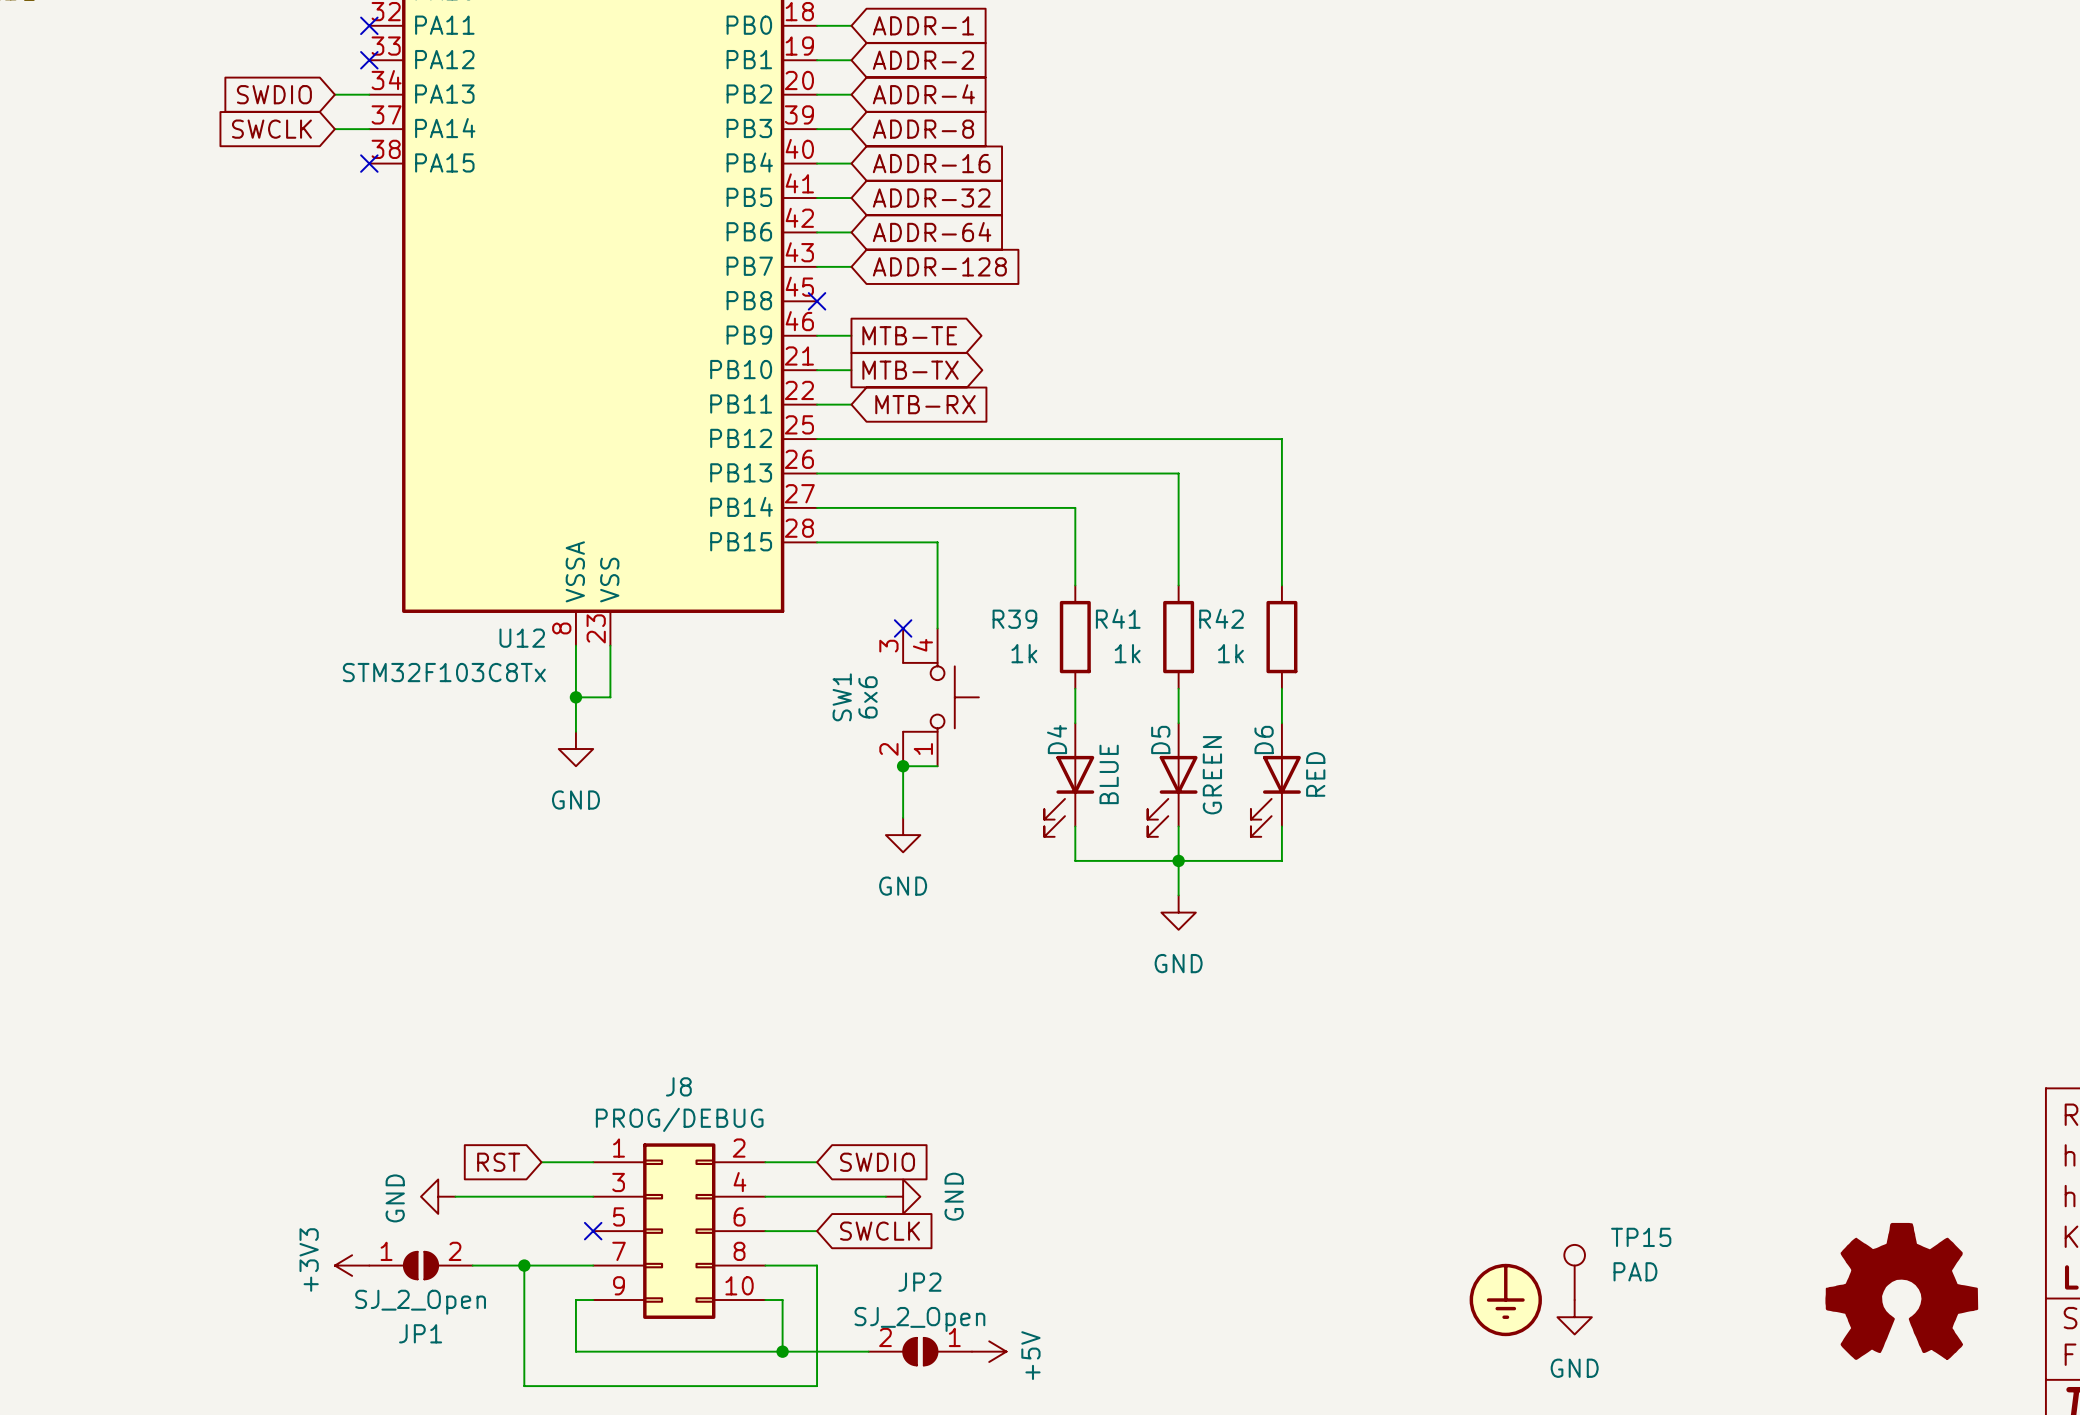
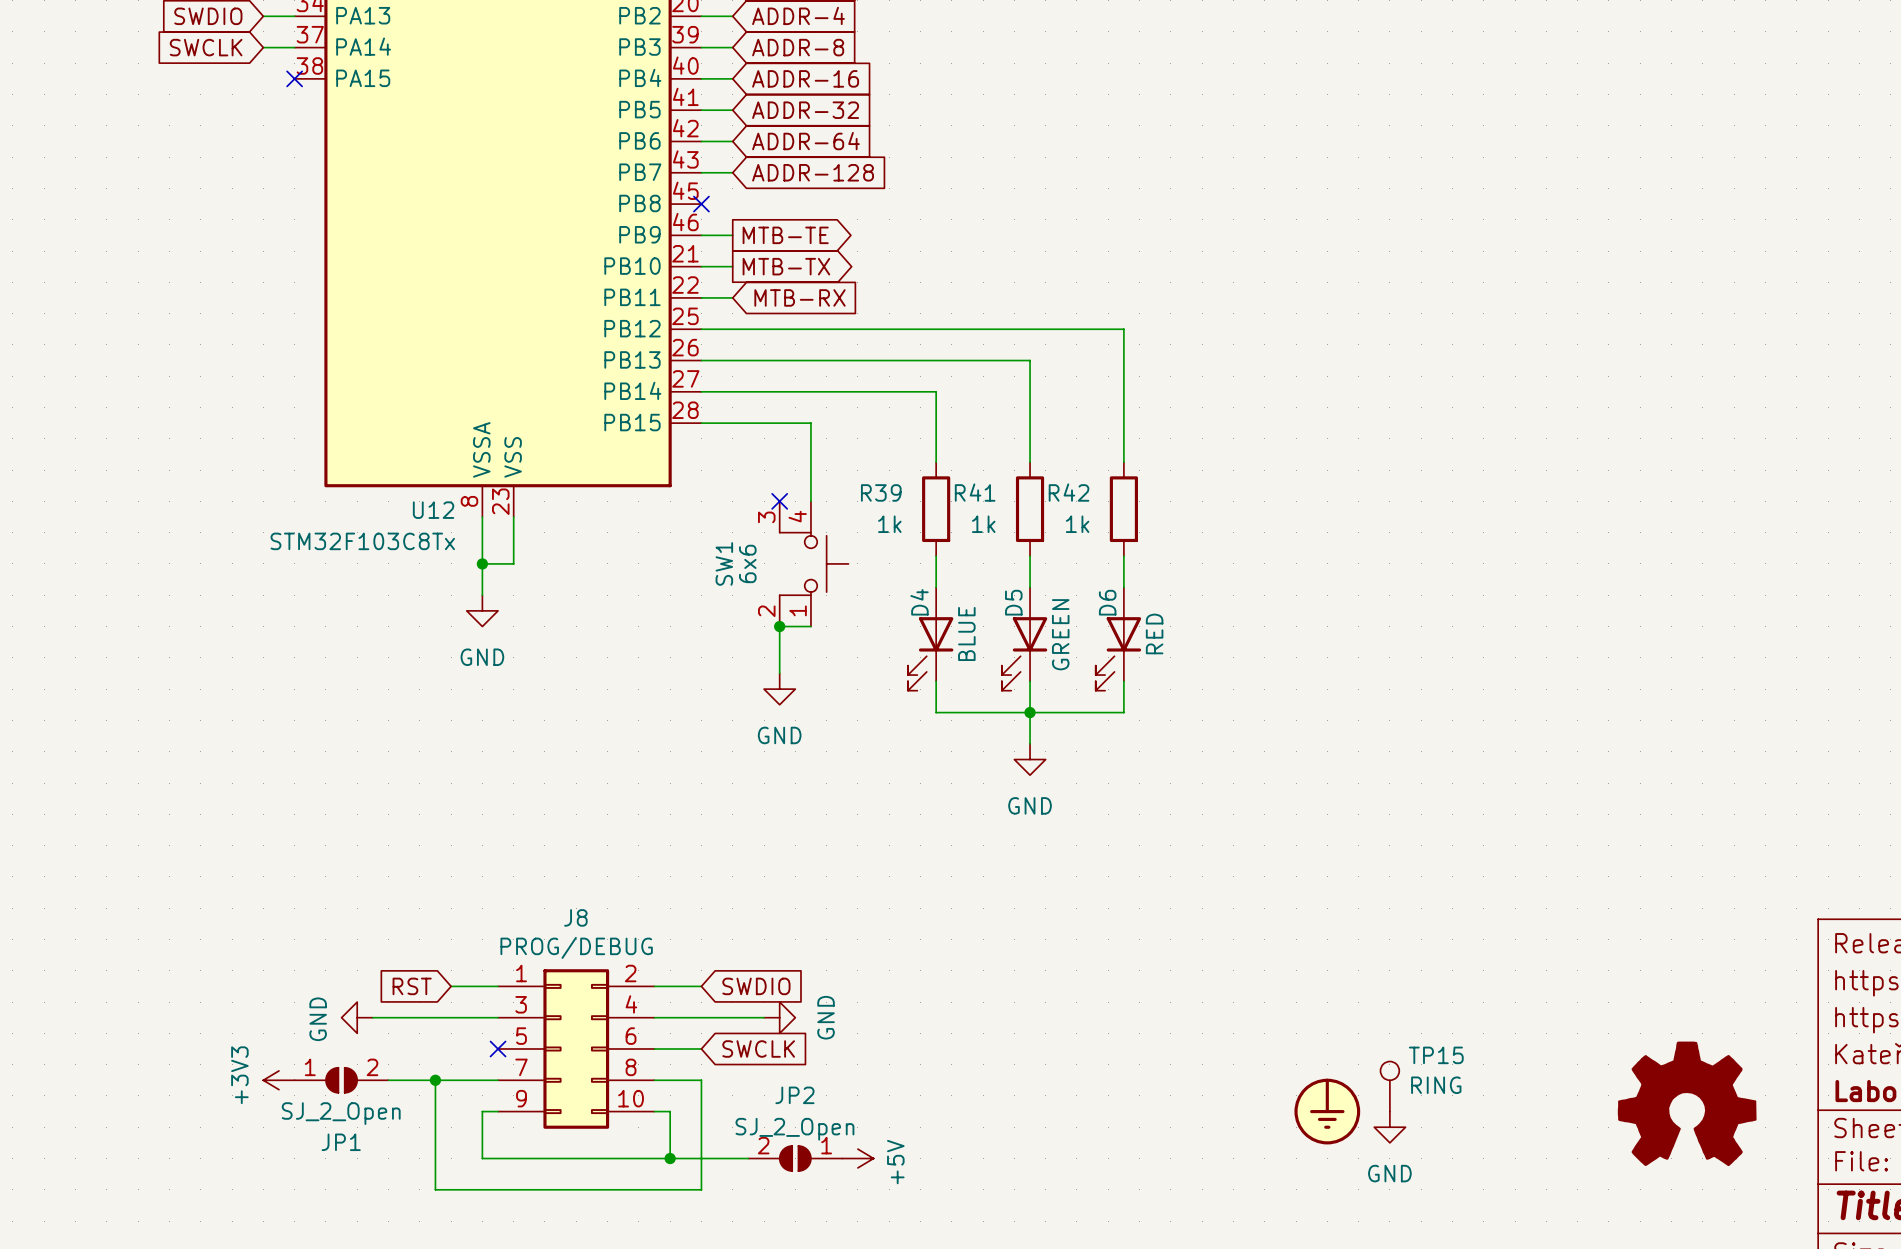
TP15 name position: TP15 (1641, 1237) -> TP15 (1436, 1055)
TP15 value: PAD (1635, 1271) -> RING (1436, 1085)

